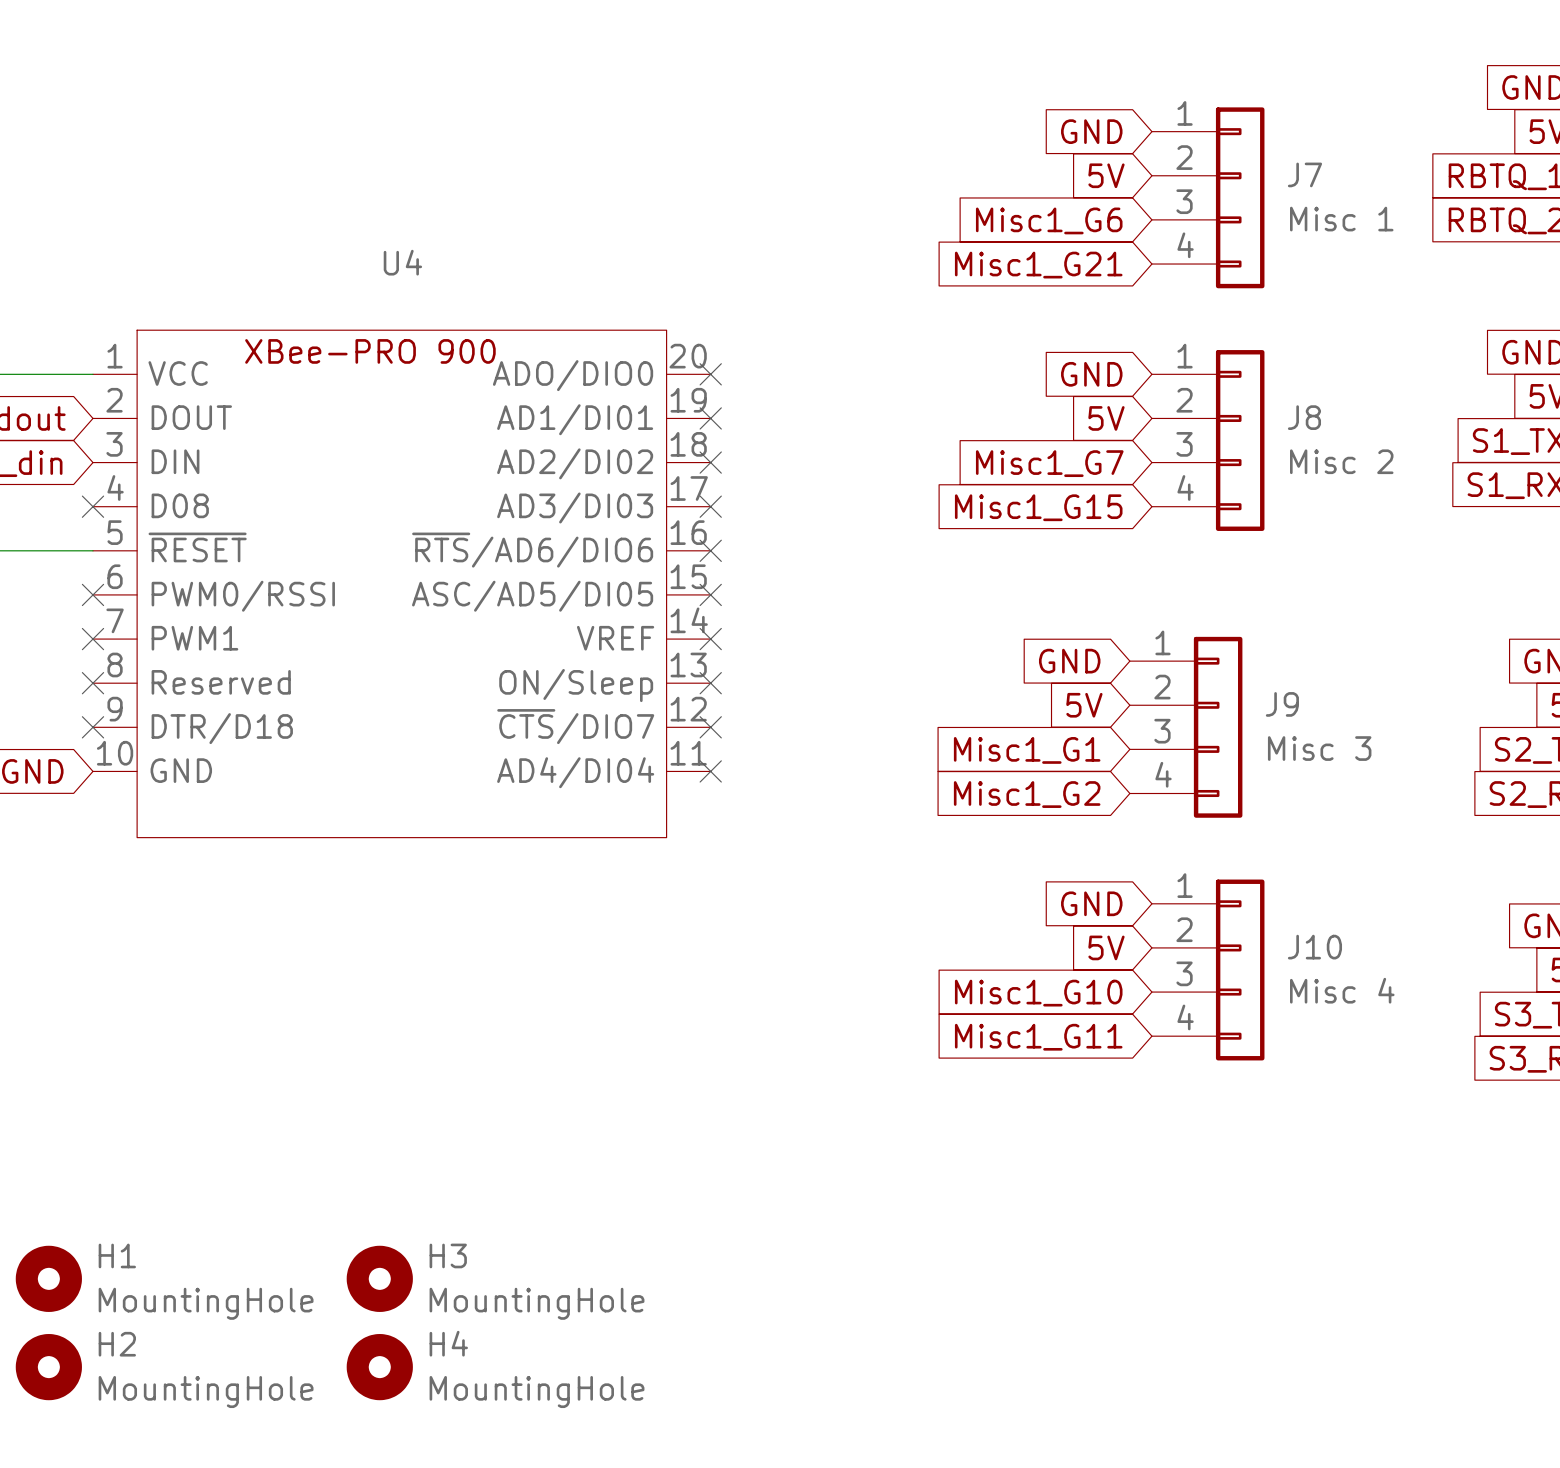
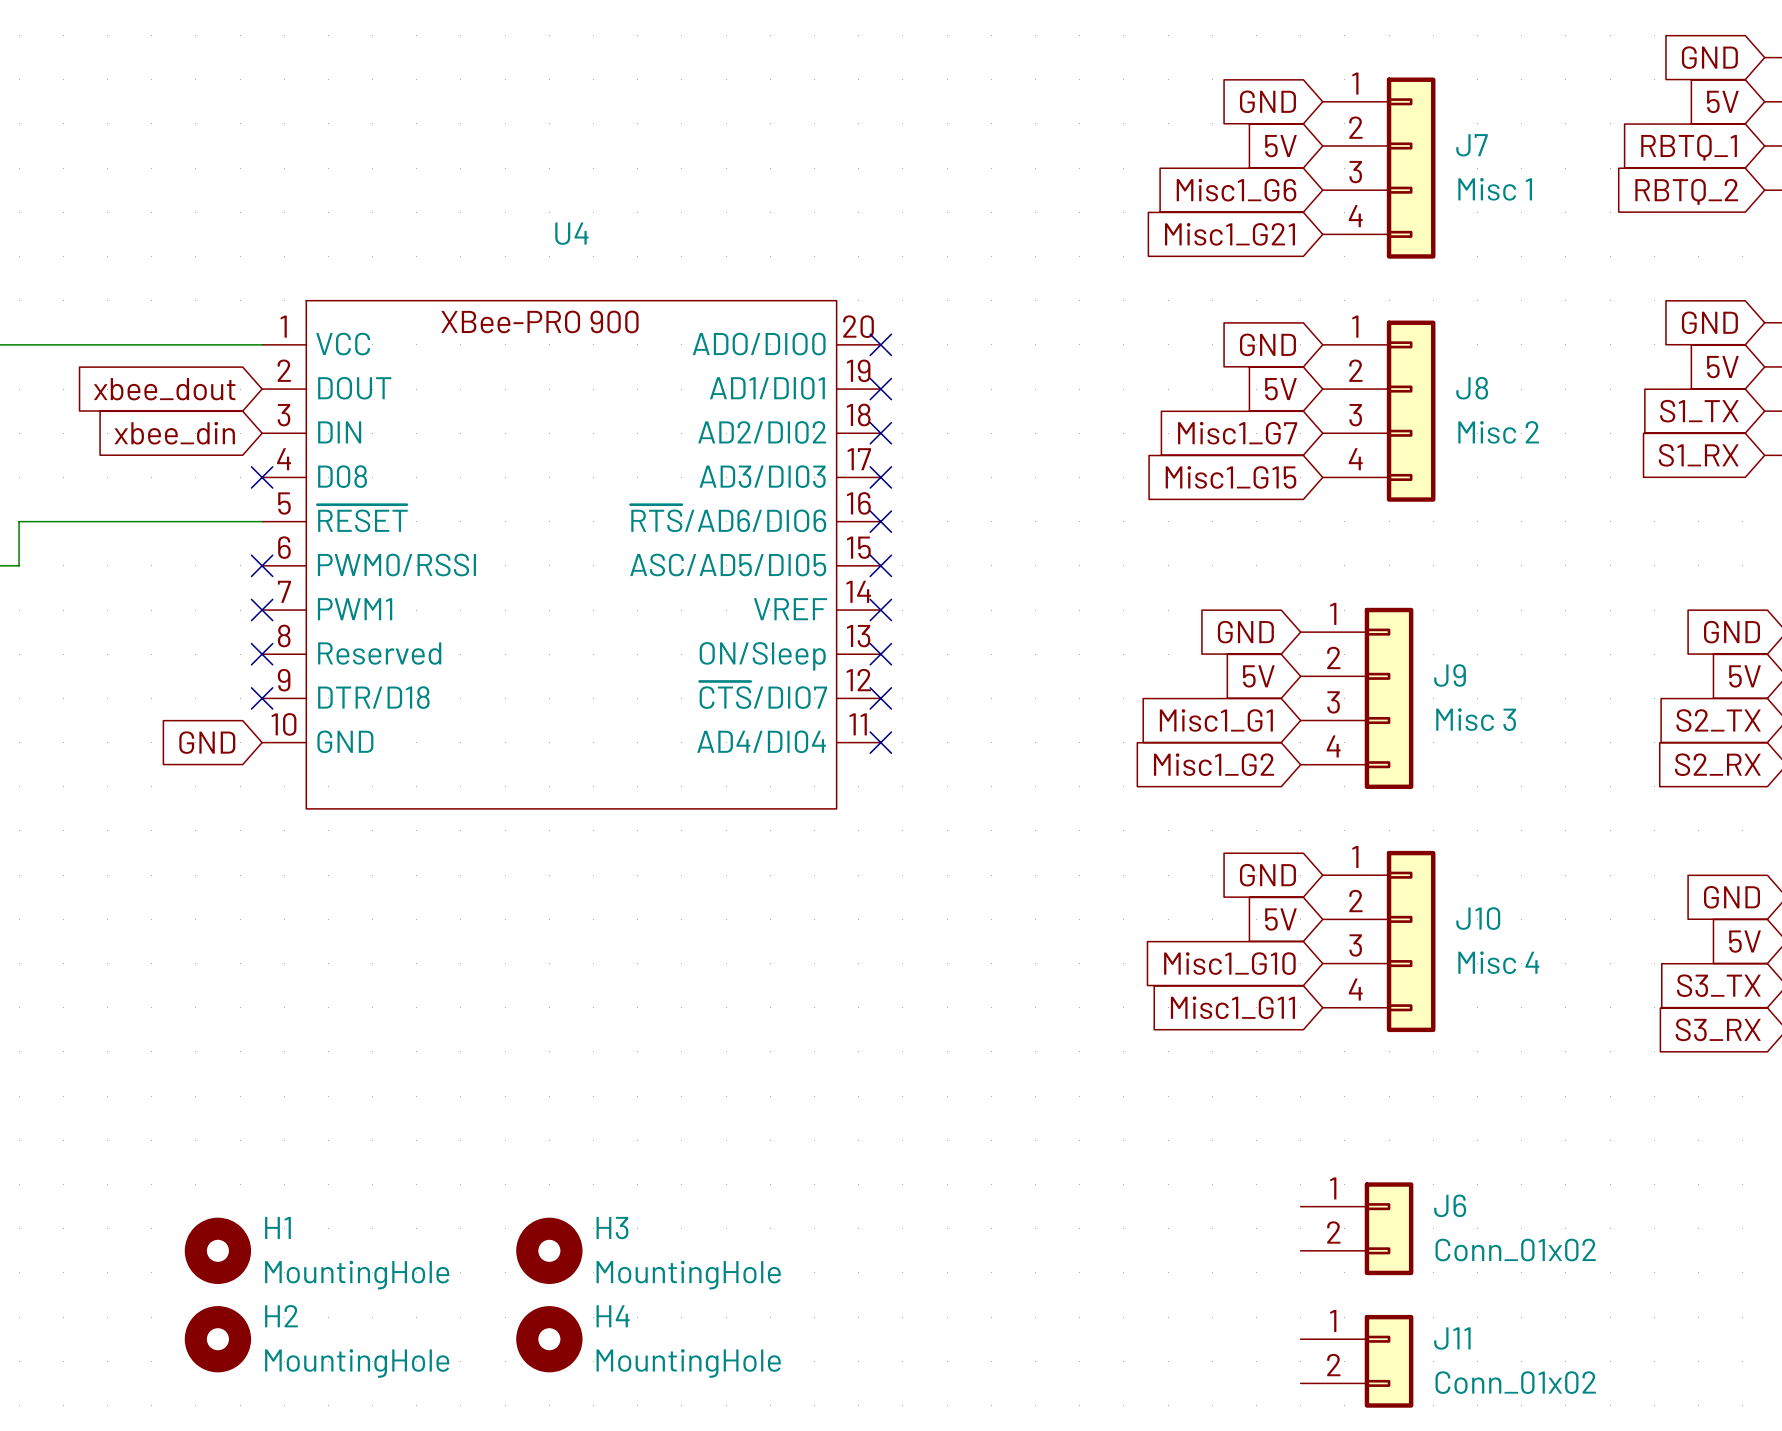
J6: none -> Conn_01x02 (1357, 1228)
J11: none -> Conn_01x02 (1357, 1361)

